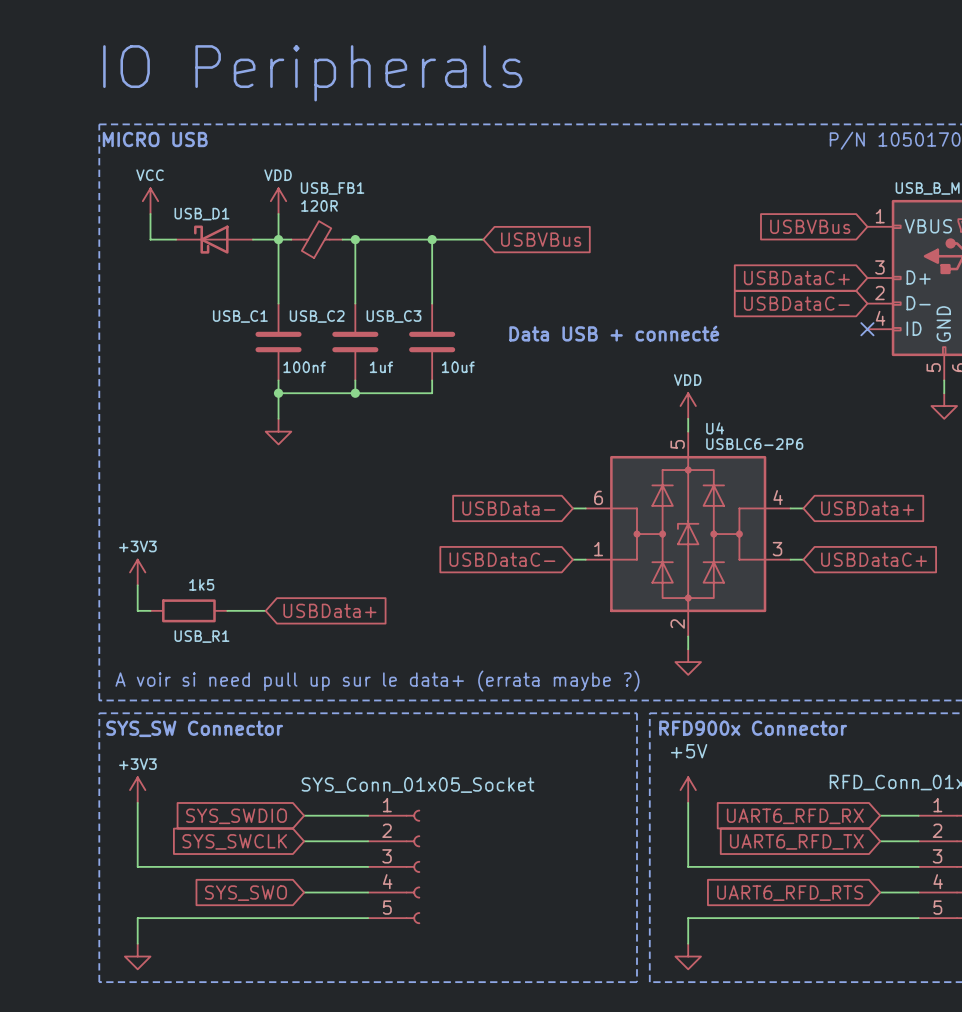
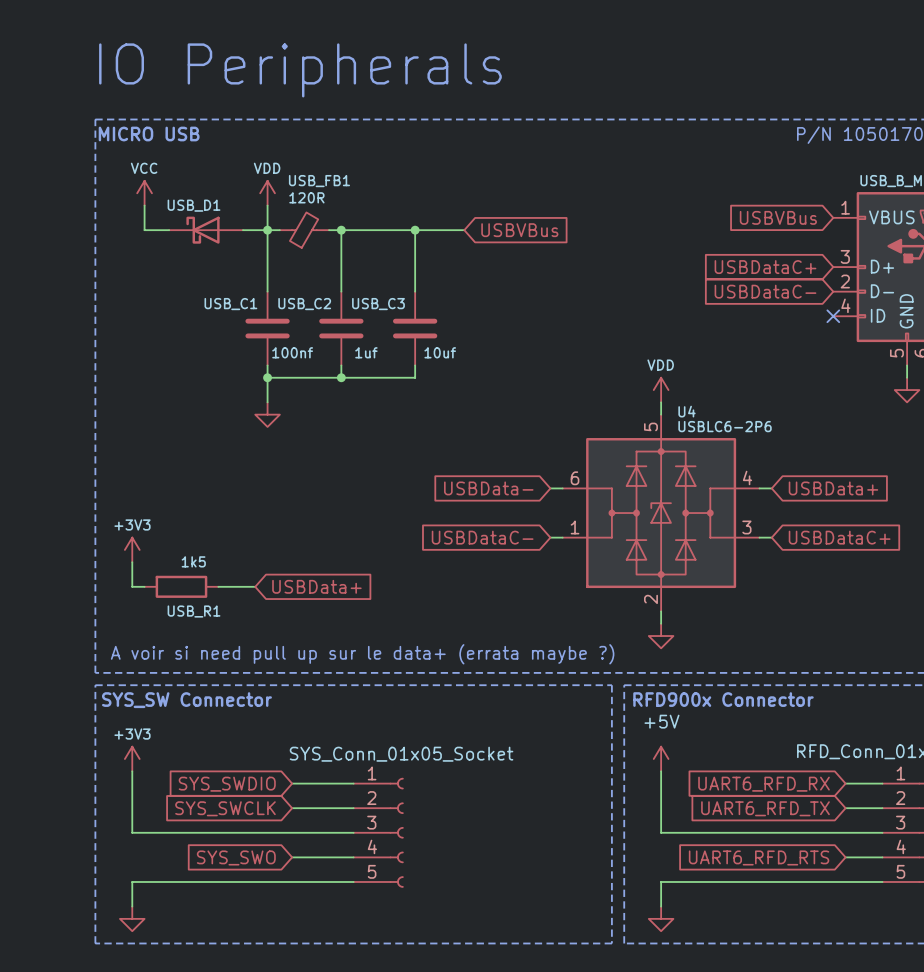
text: Data USB + connecté (614, 333) -> none

